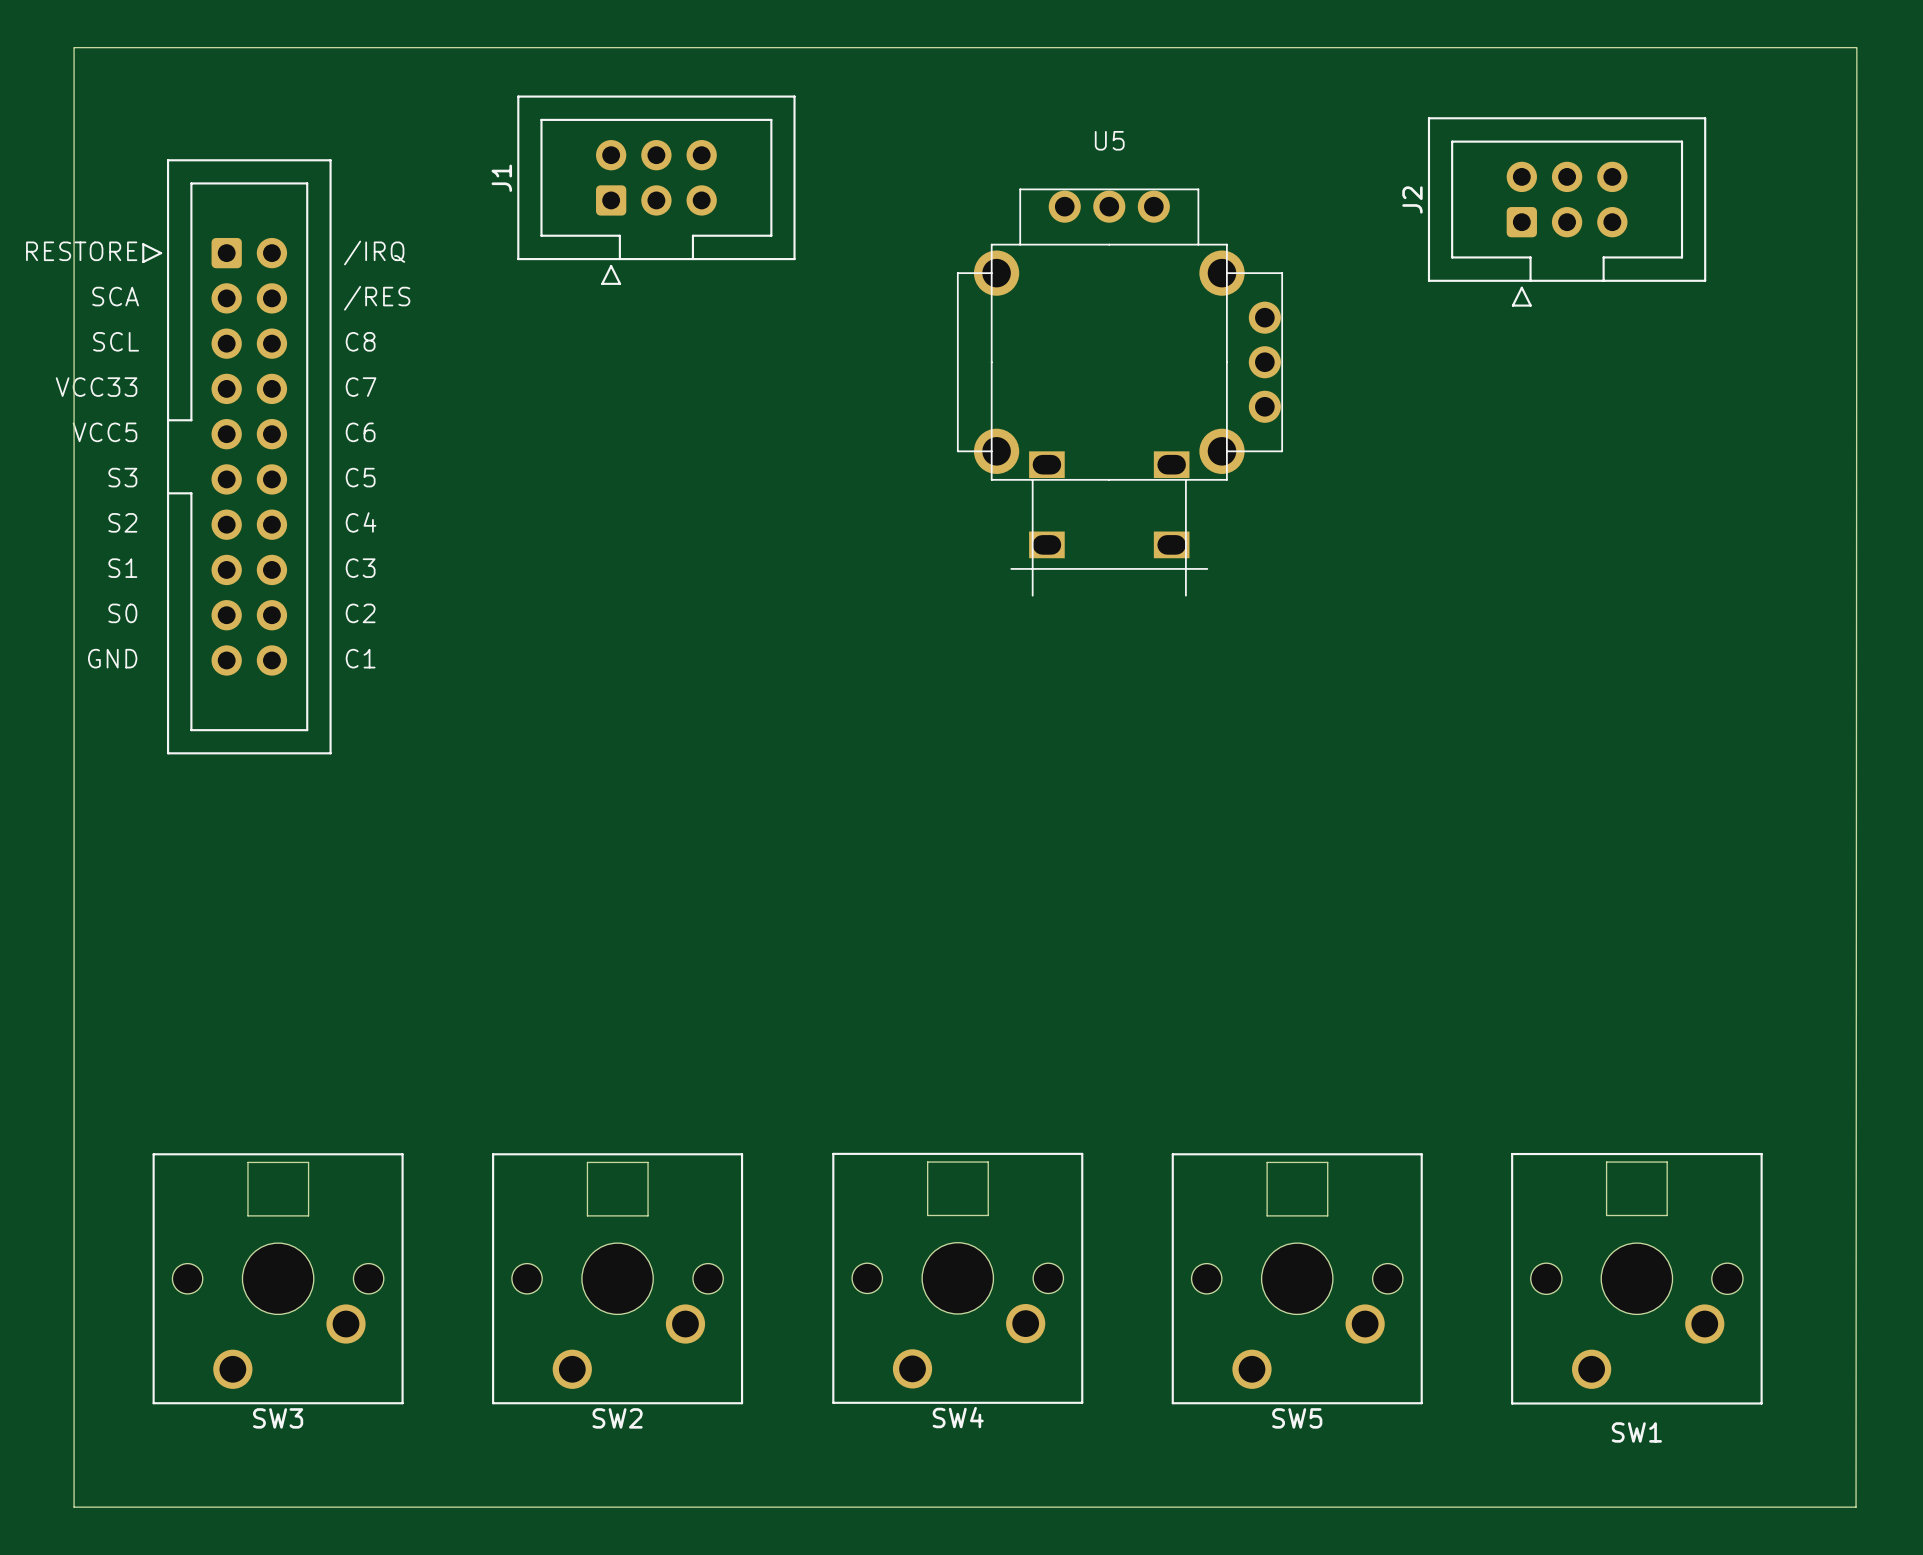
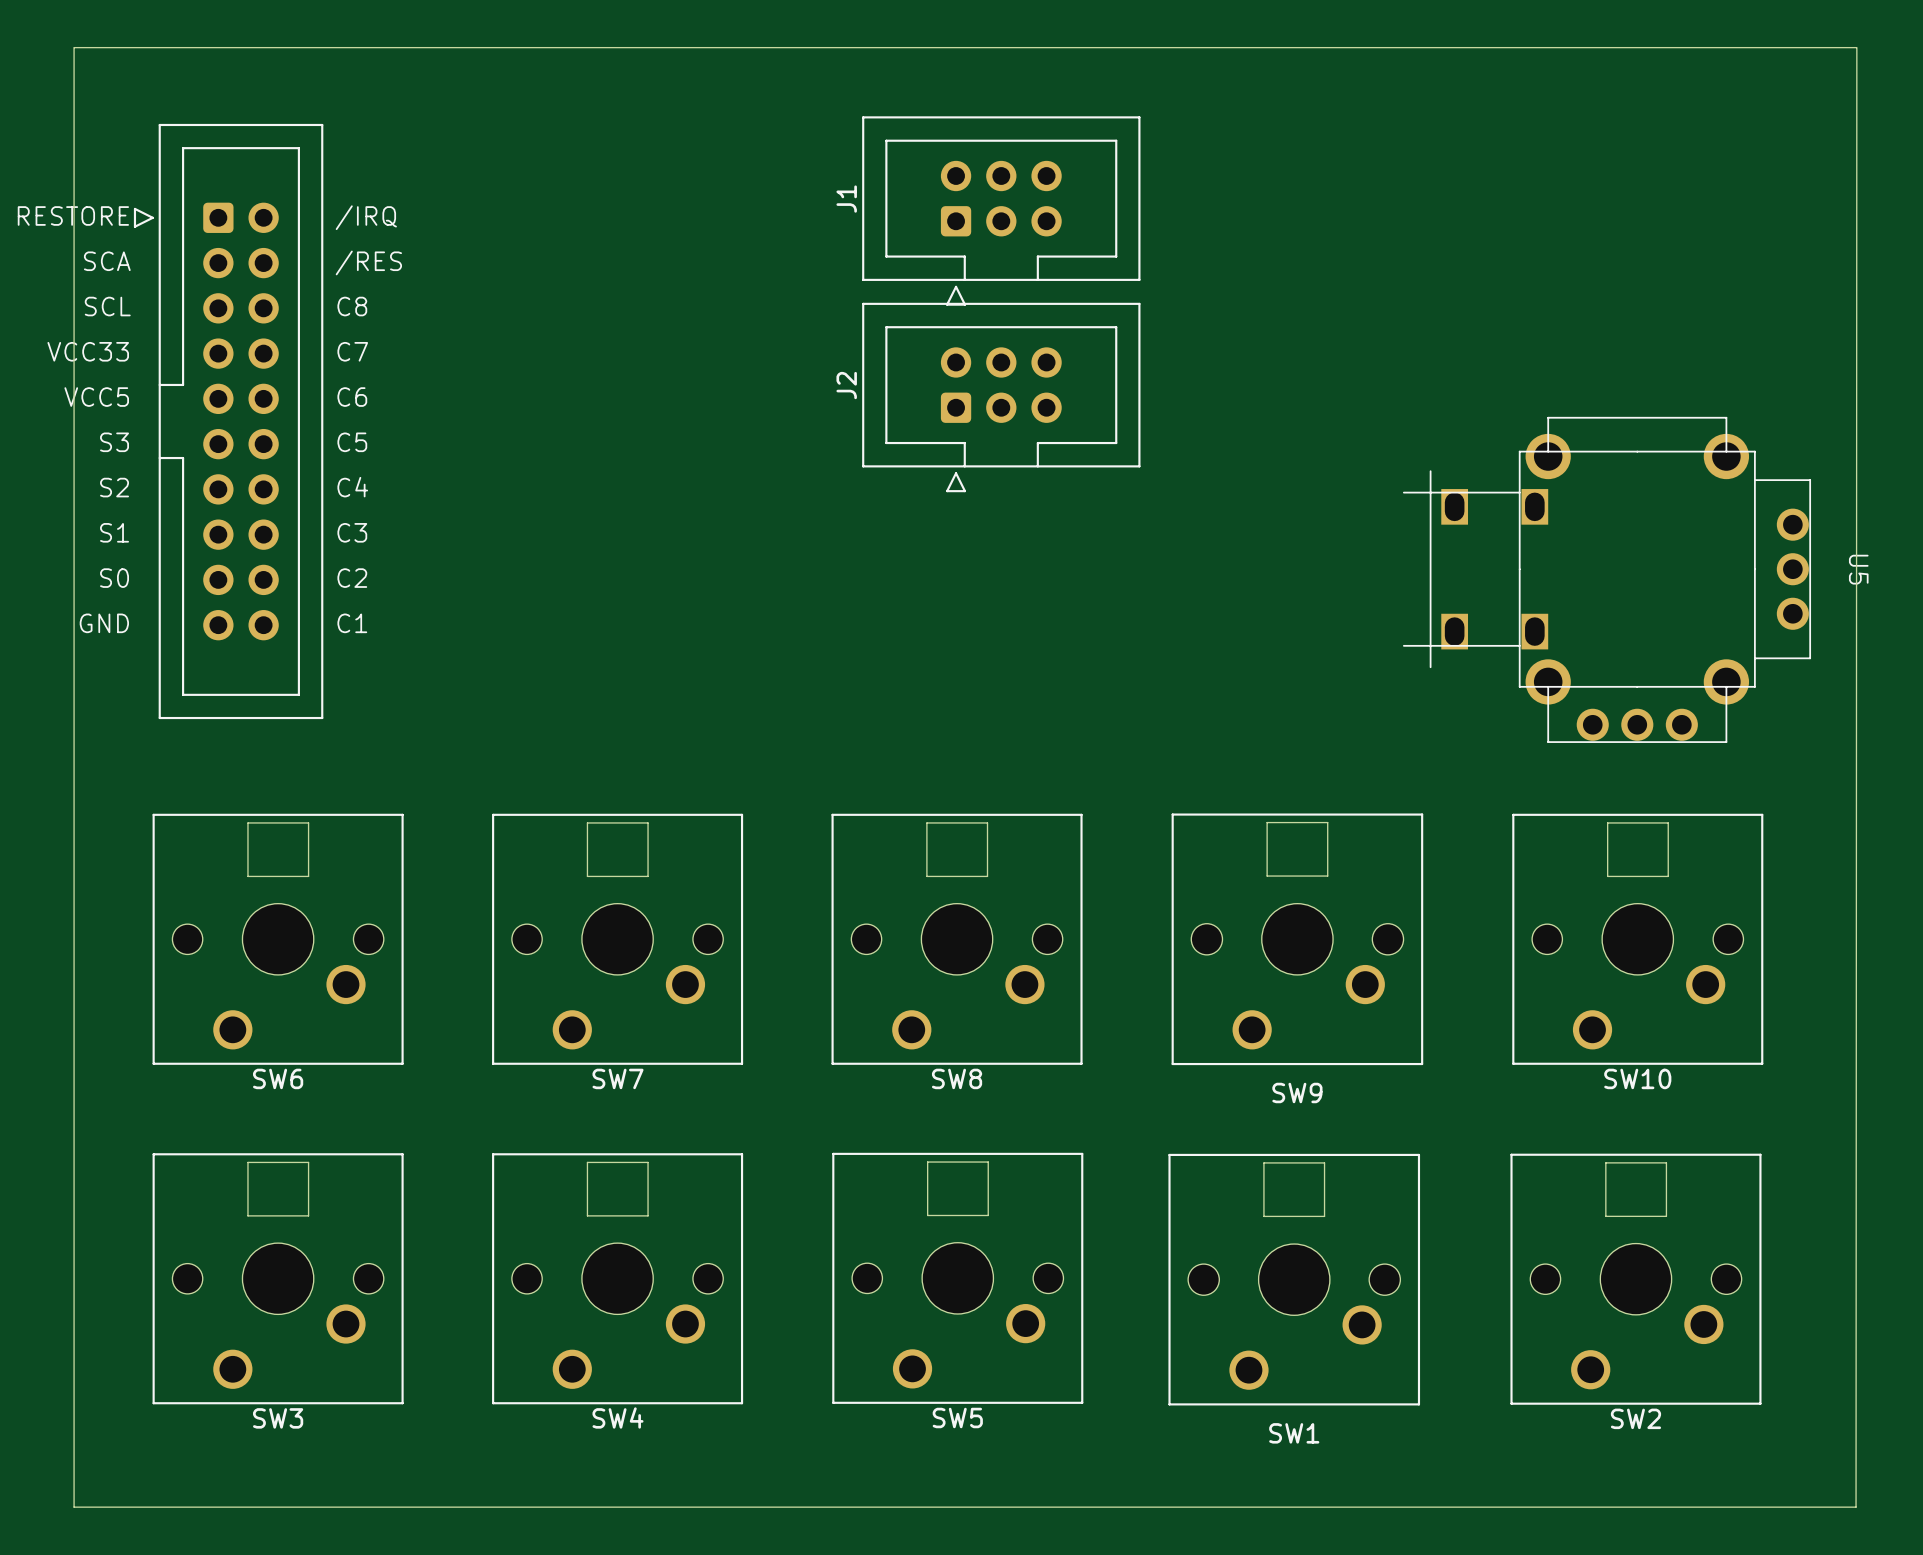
J1 position: (656, 190) -> (1001, 211)
J2 position: (1567, 211) -> (1001, 397)
U5 rotation: 0° (1119, 392) -> 90° clockwise (1607, 579)
U5 position: (1119, 392) -> (1607, 579)
part position: (236, 456) -> (228, 421)
SW6: none -> (278, 939)
SW7: none -> (617, 939)
SW8: none -> (957, 939)
SW9: none -> (1297, 939)
SW10: none -> (1637, 939)
SW5: (1297, 1278) -> none
SW1 position: (1636, 1278) -> (1294, 1279)
SW2: none -> (1635, 1279)
SW4 name: SW4 (958, 1417) -> SW5 (957, 1417)
SW2 name: SW2 (617, 1418) -> SW4 (618, 1417)

